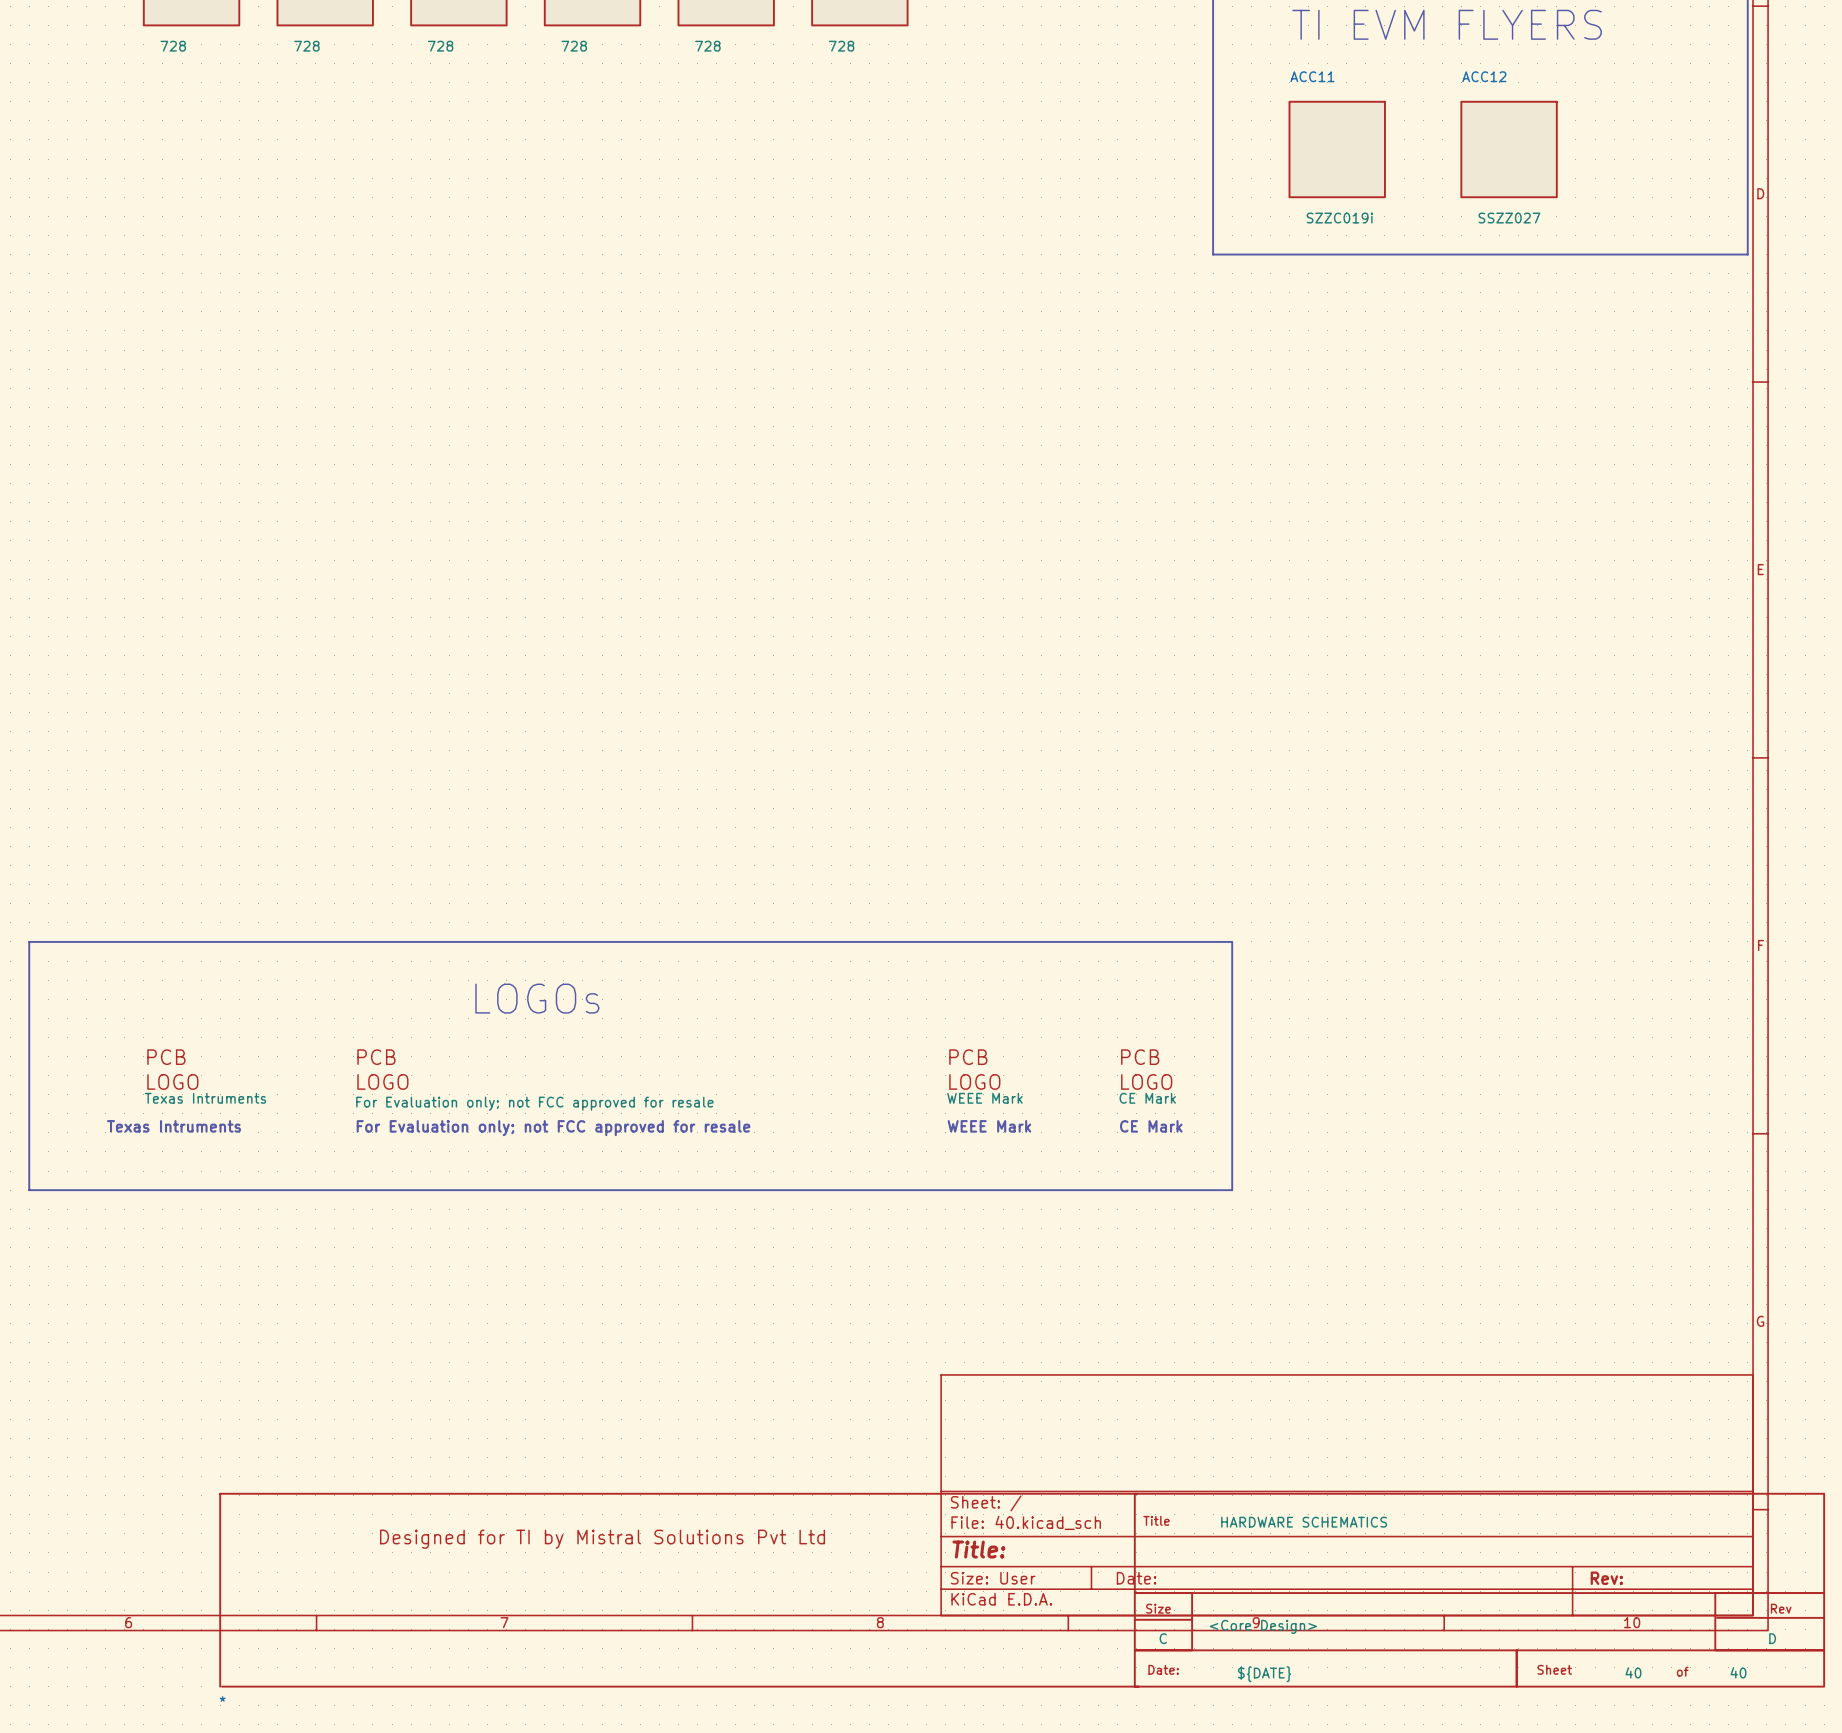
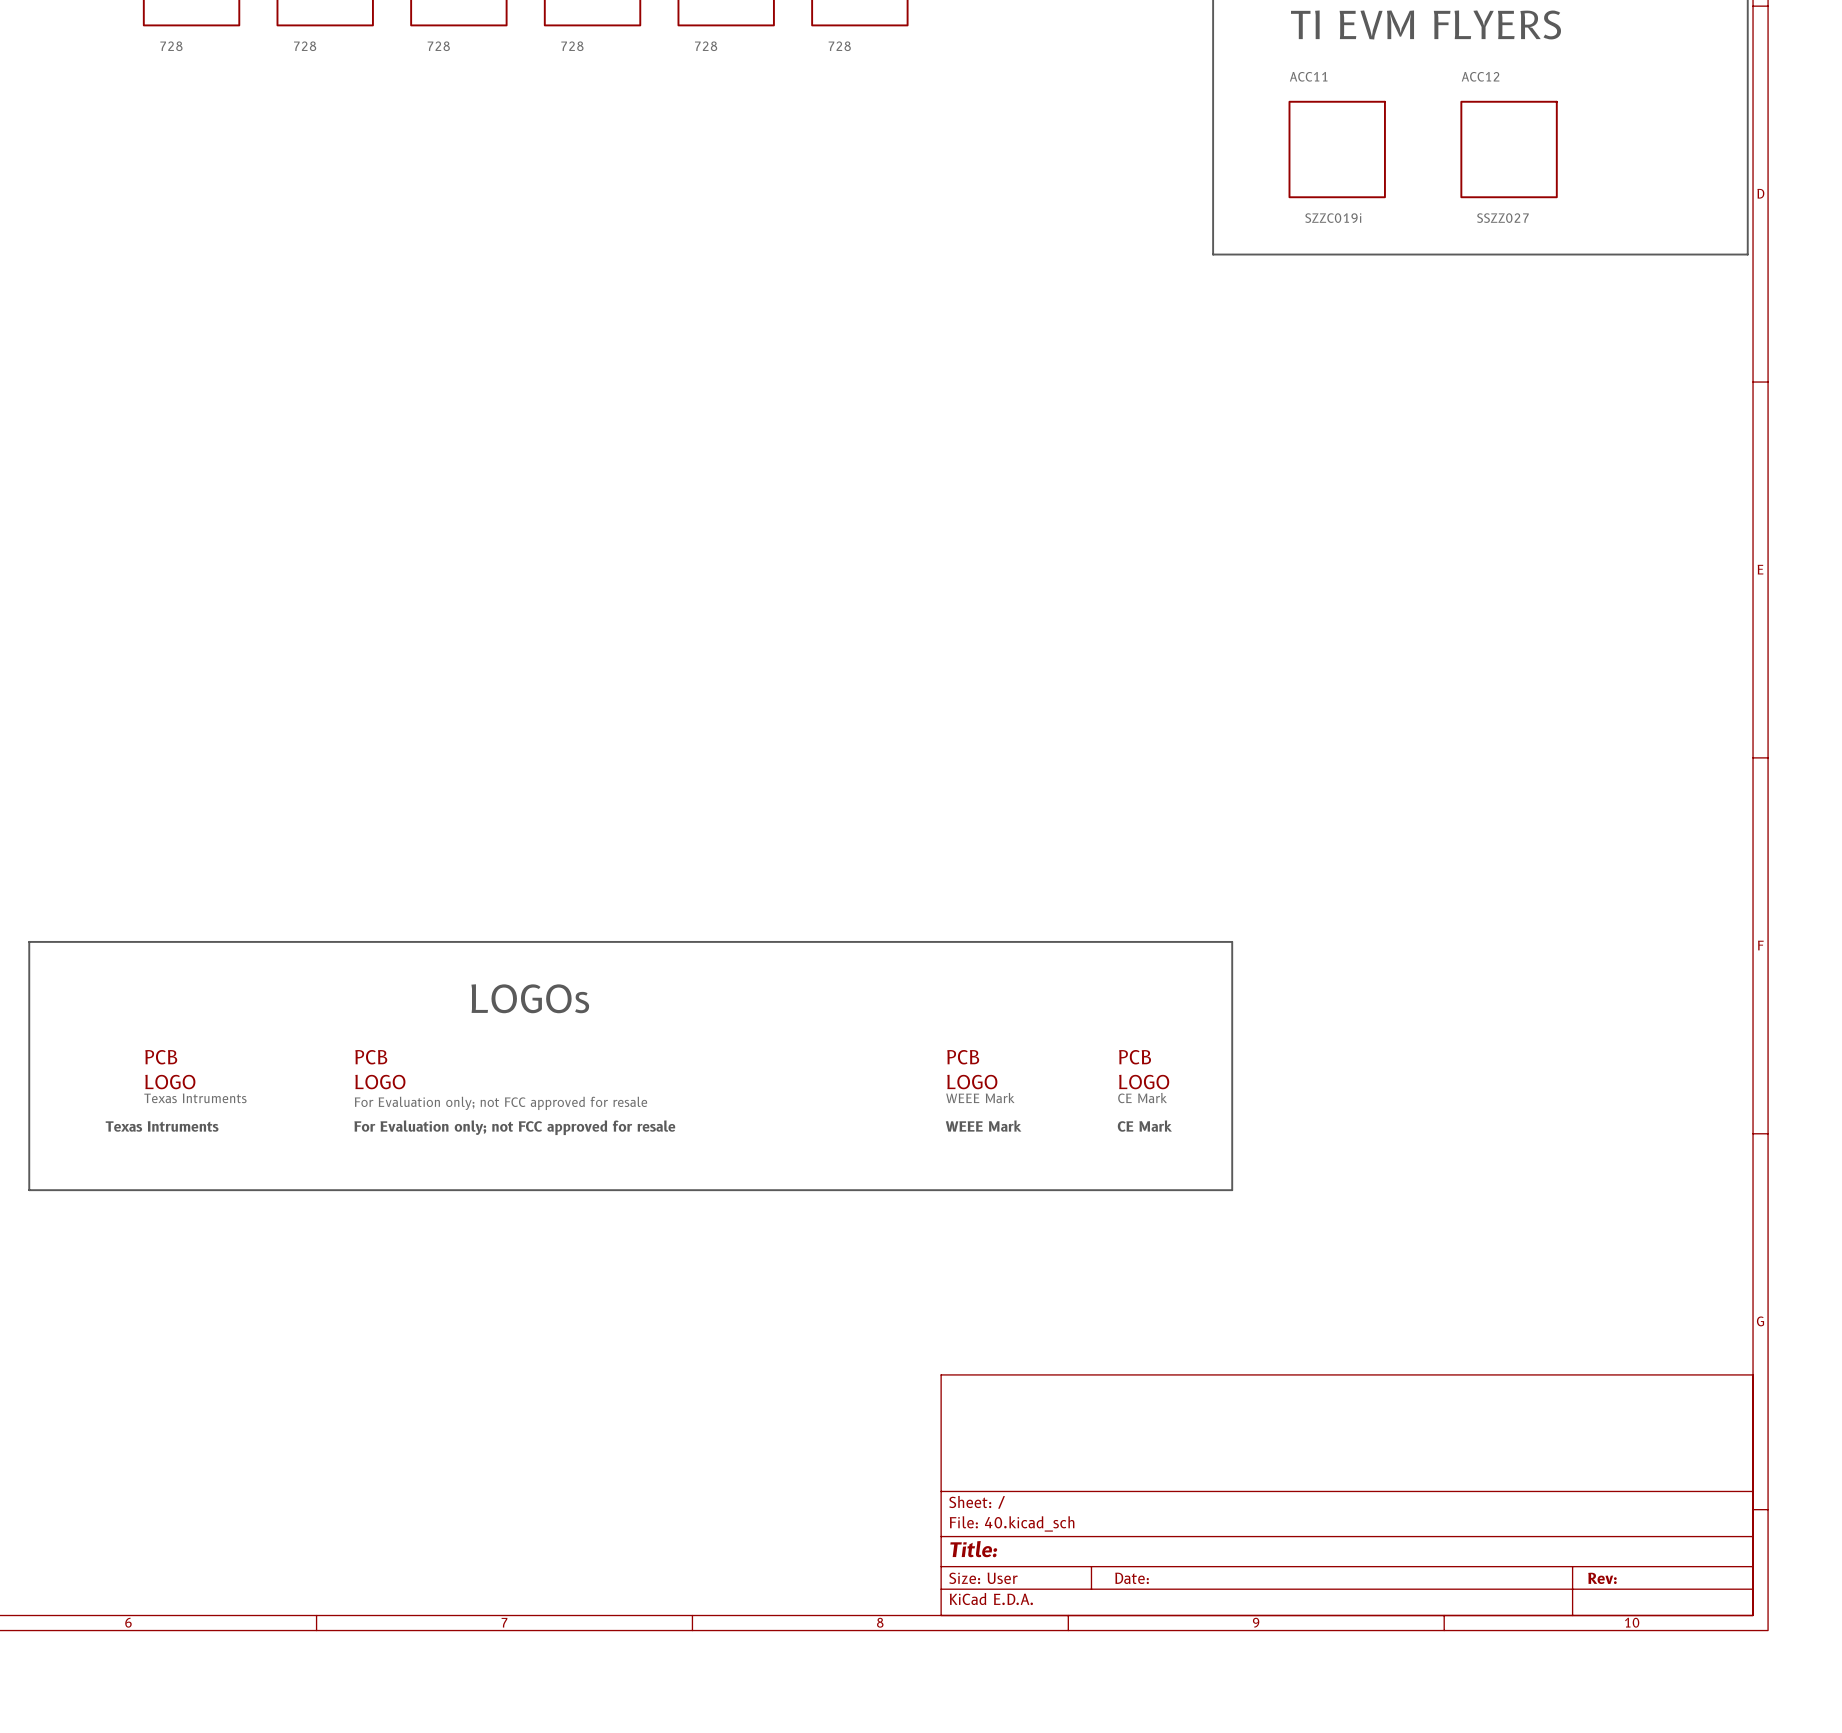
part: (1022, 1590) -> none

